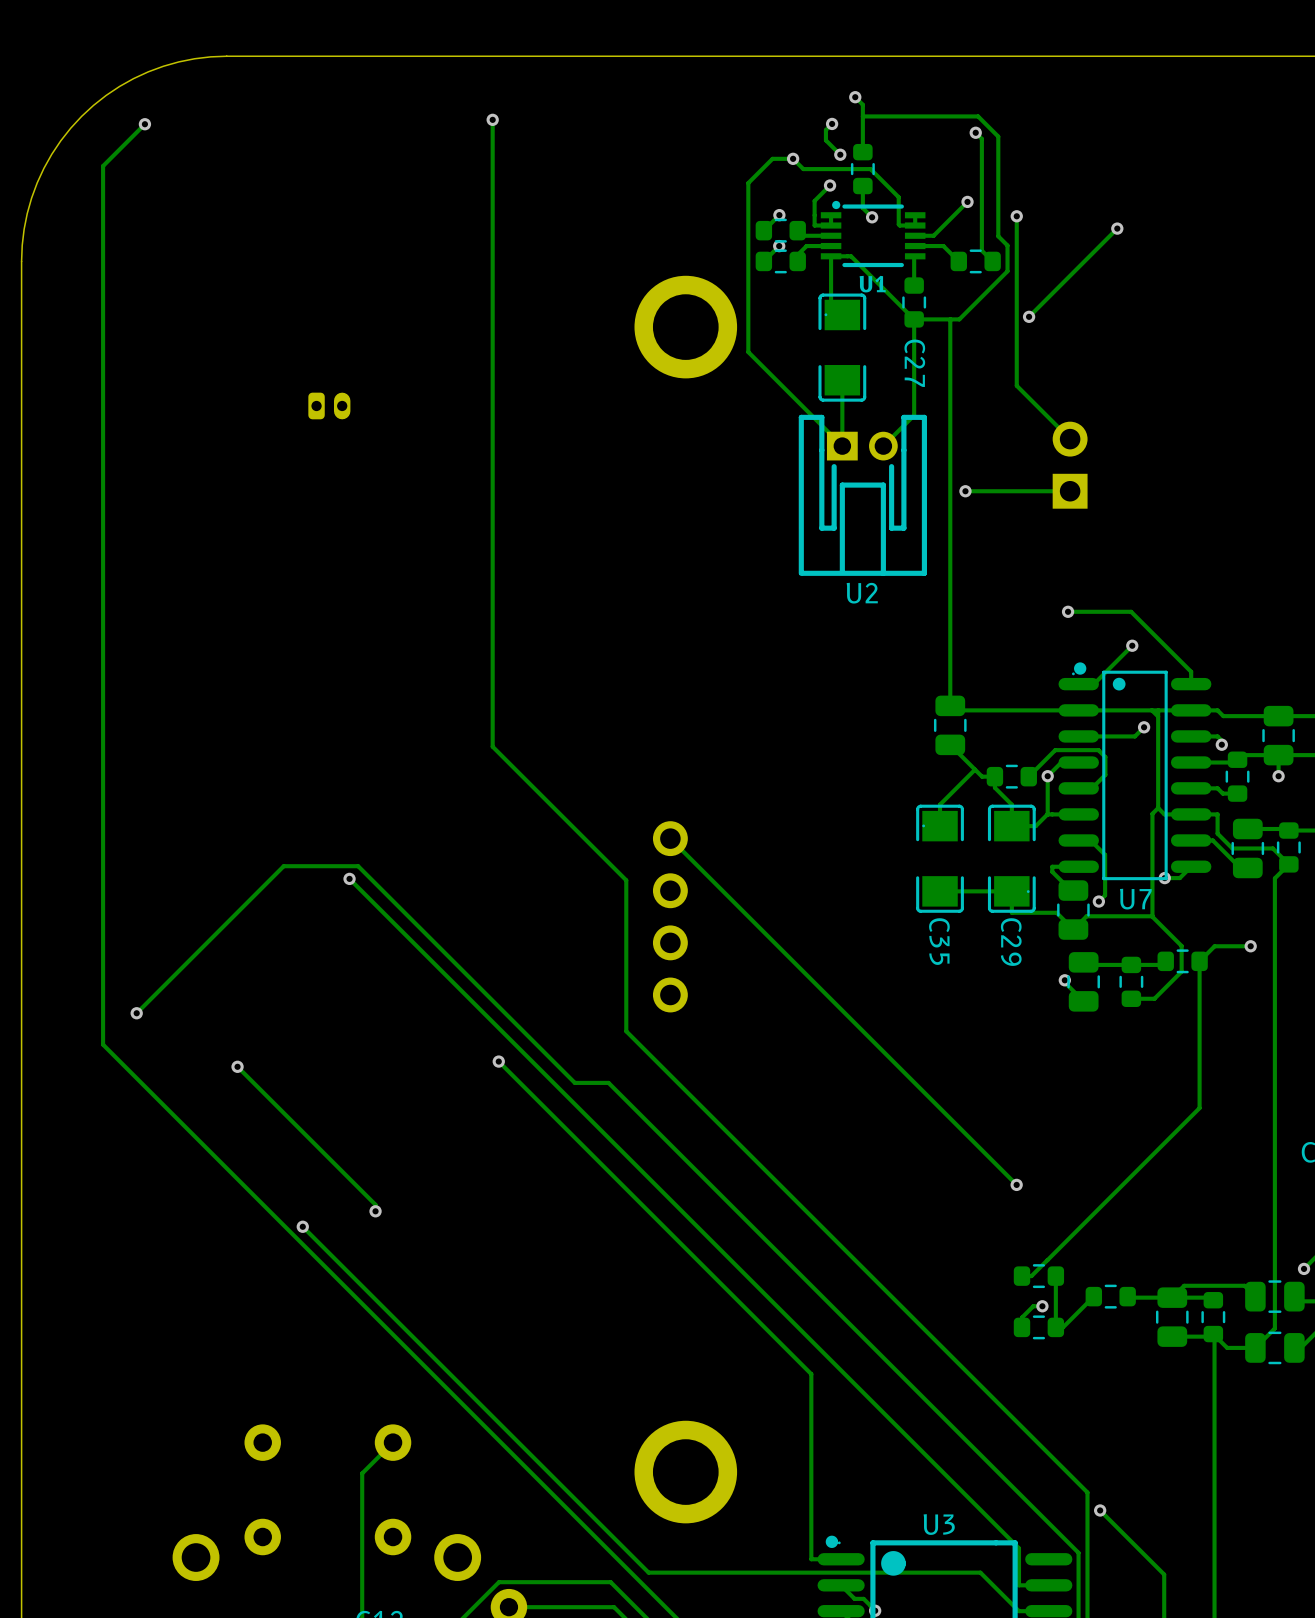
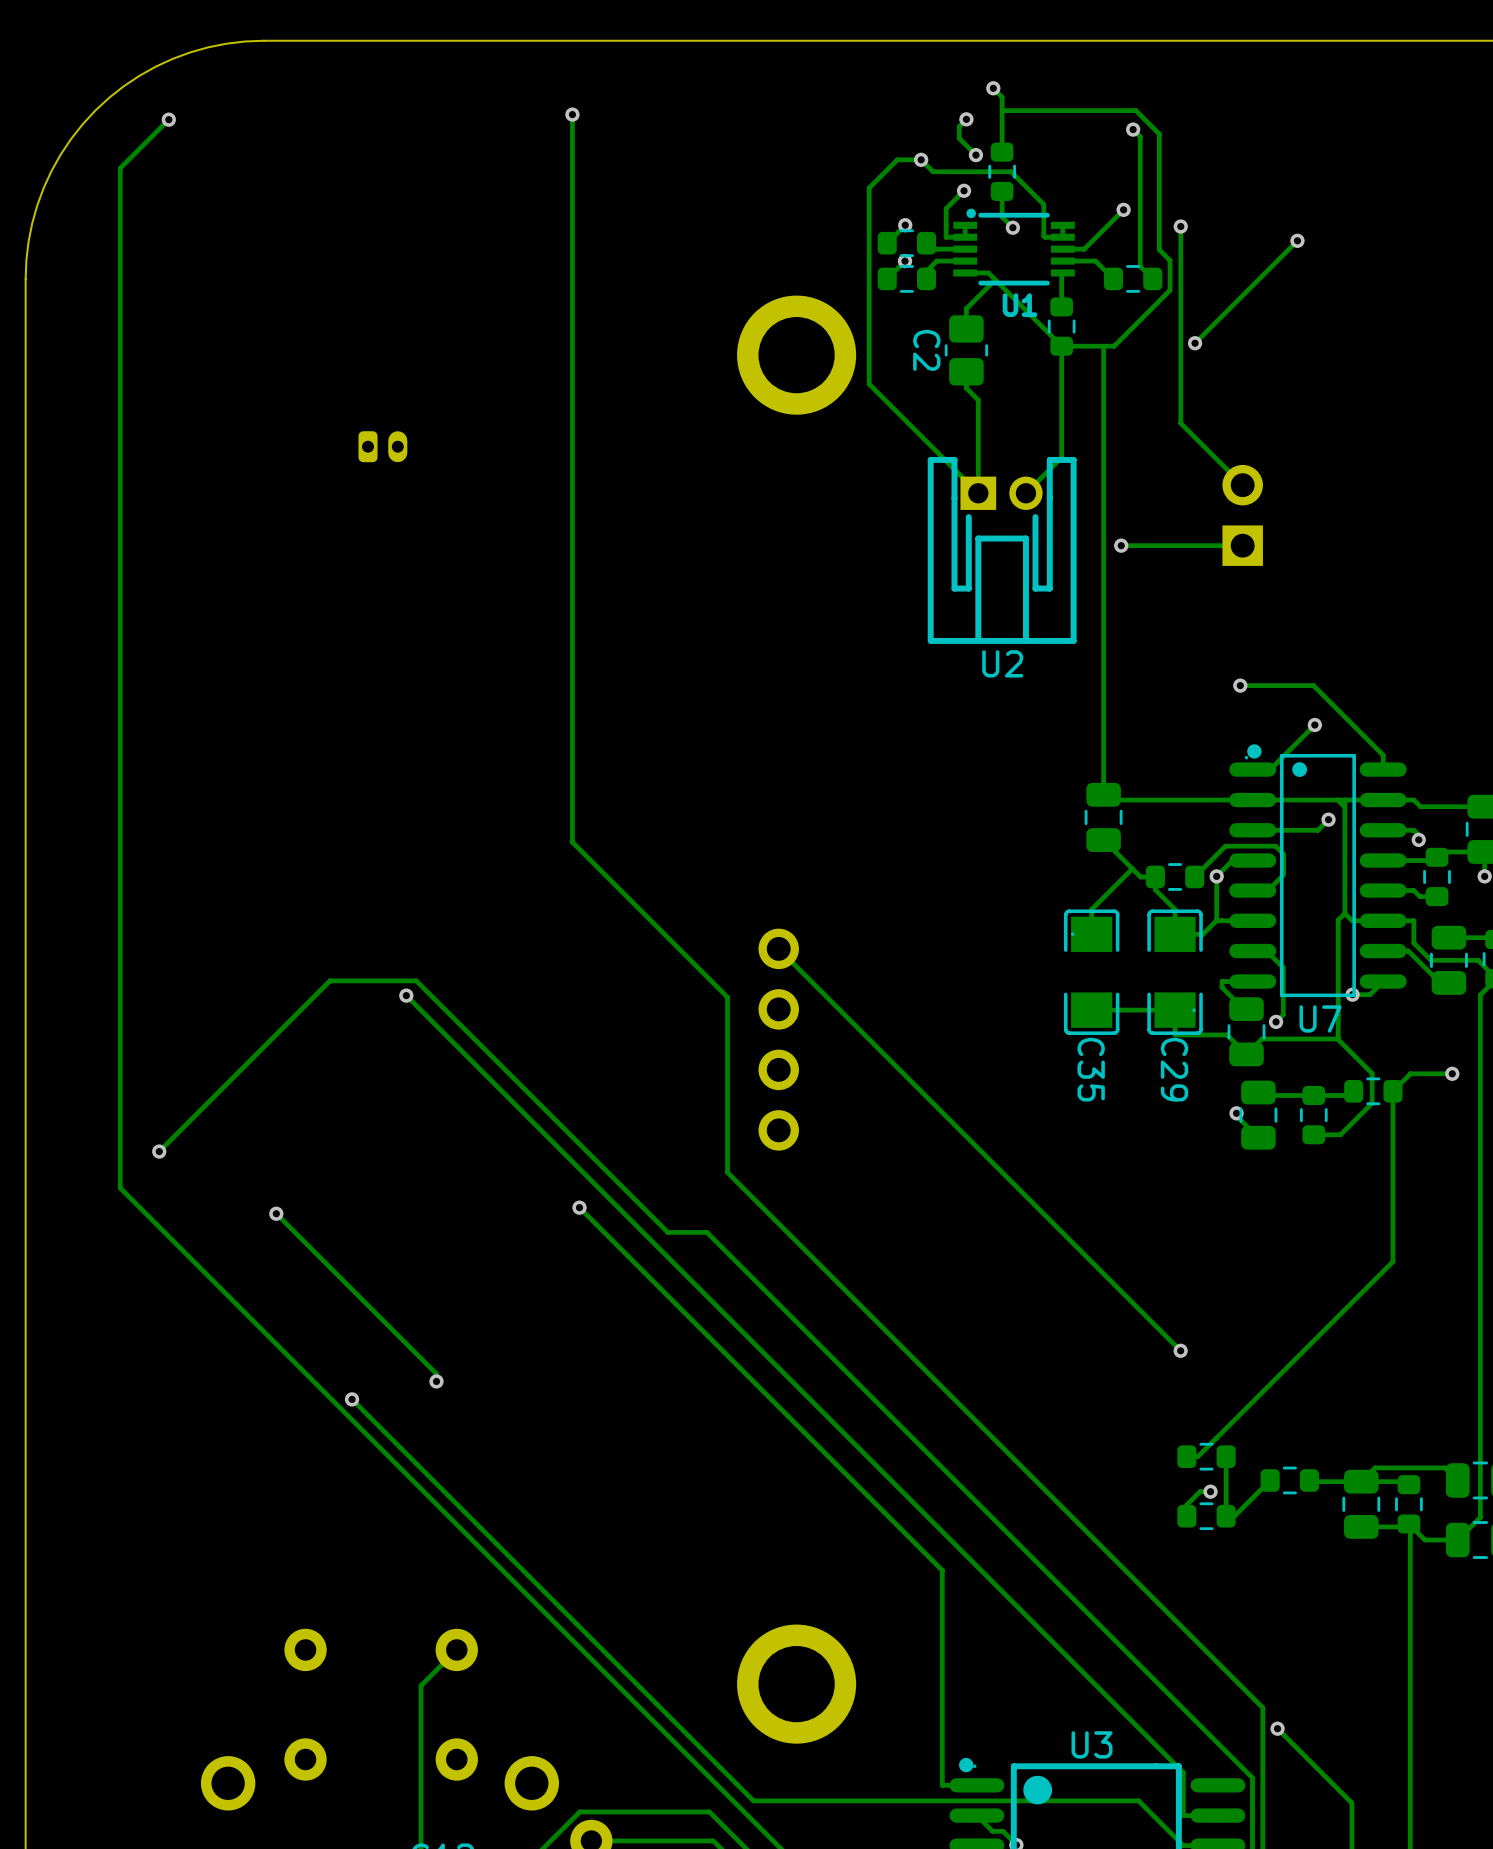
track: (831, 256) (831, 303) (842, 314) -> none
track: none -> (995, 279) (966, 308) (966, 328)
C2: none -> (966, 350)
track: none -> (966, 371) (966, 388) (978, 400) (978, 416)
C27: (842, 347) -> none

